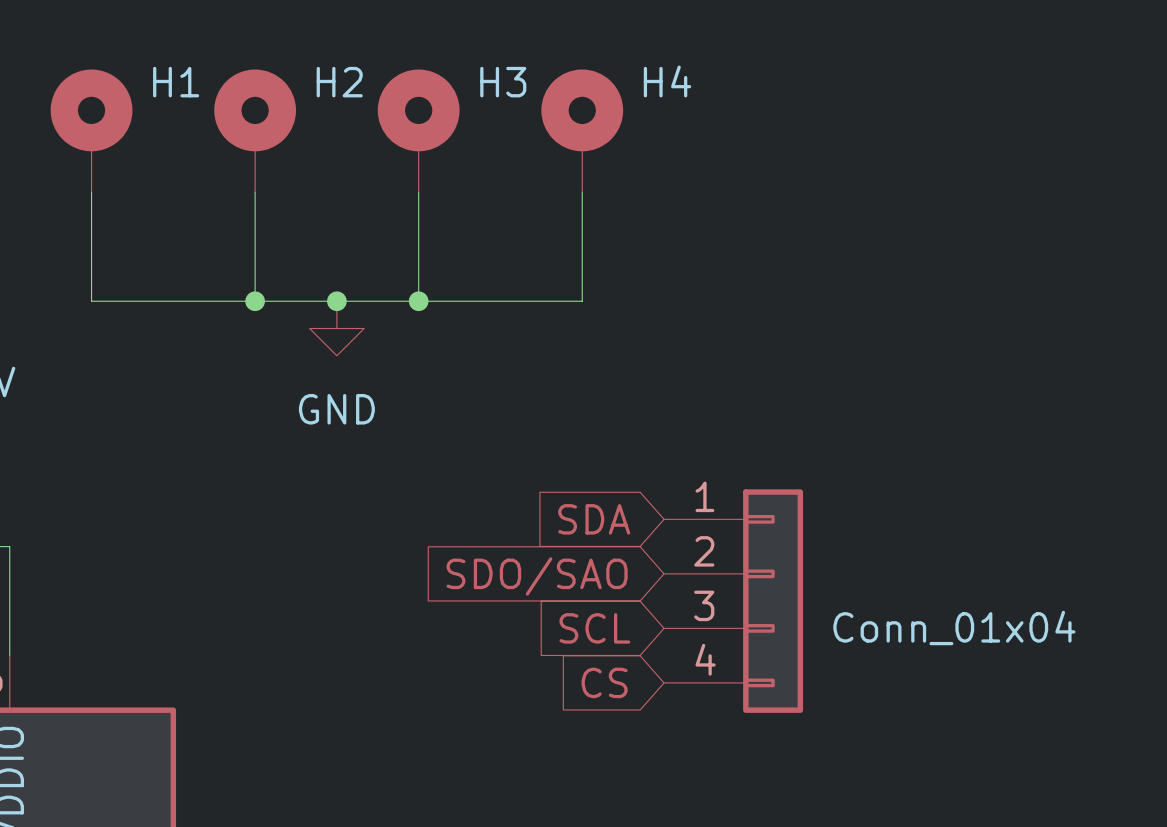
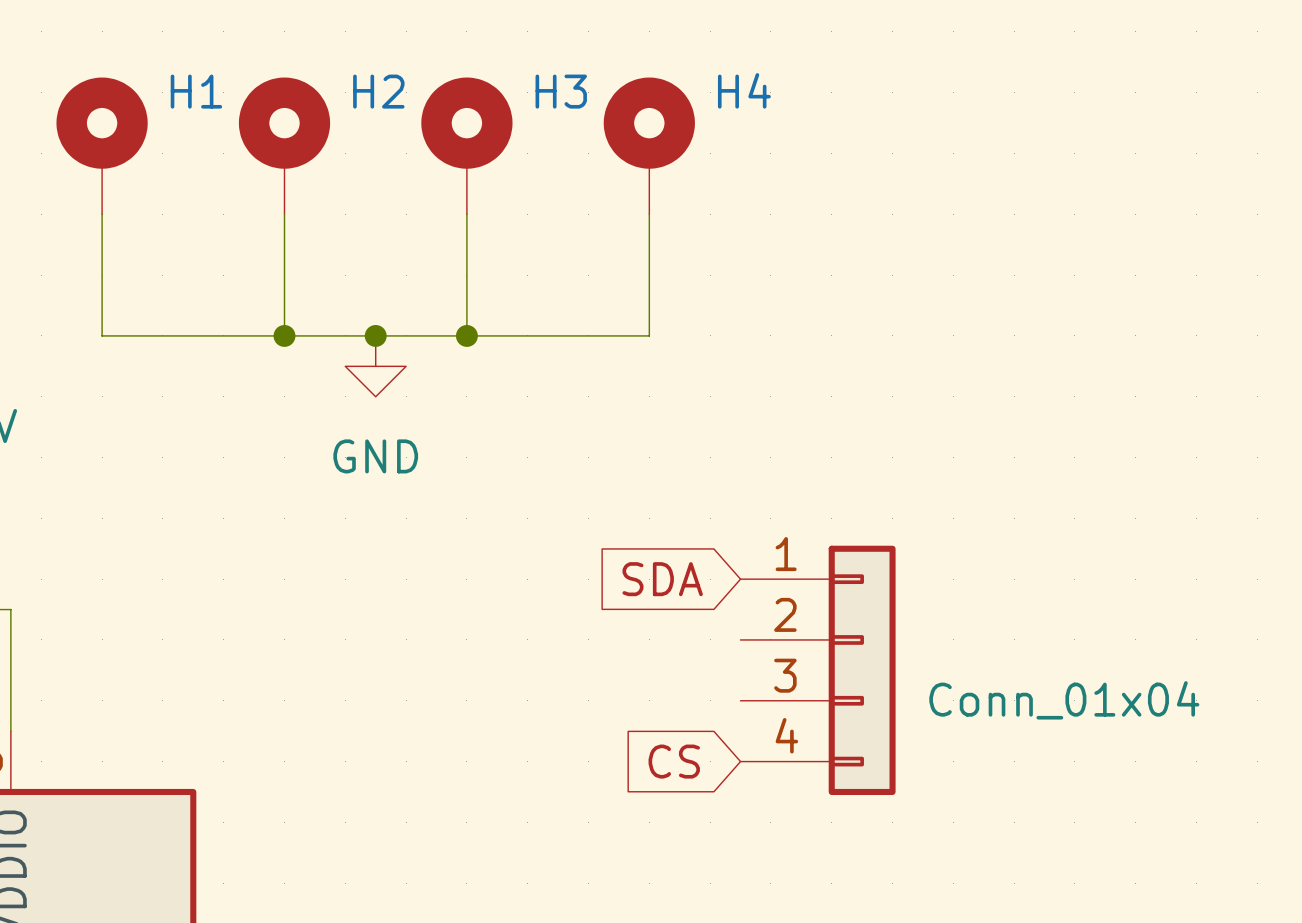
global label: SDO/SAO (537, 576) -> none
global label: SCL (594, 628) -> none

